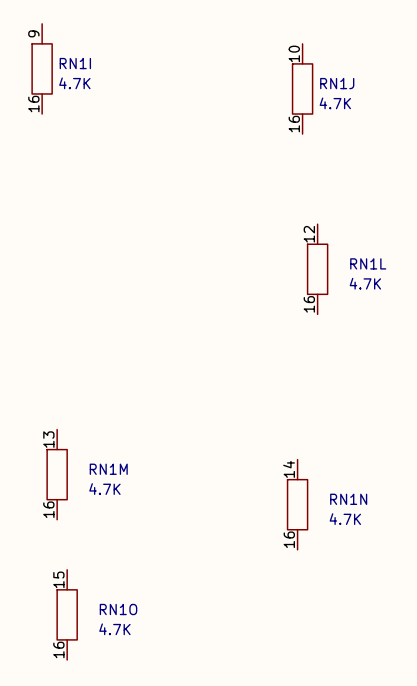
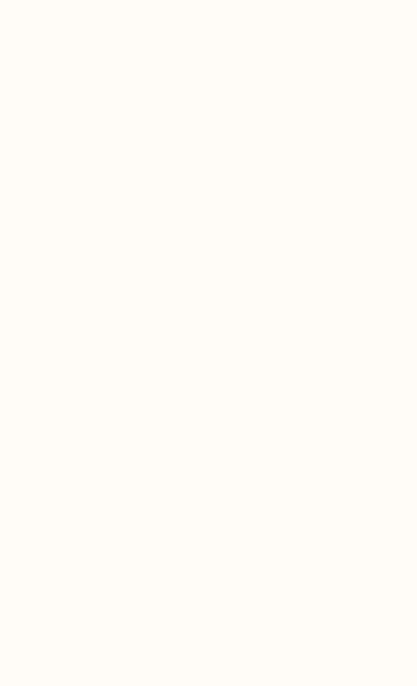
RN1I: 4.7K (42, 68) -> none
RN1J: 4.7K (302, 88) -> none
RN1L: 4.7K (317, 269) -> none
RN1M: 4.7K (57, 474) -> none
RN1N: 4.7K (297, 504) -> none
RN1O: 4.7K (67, 614) -> none

